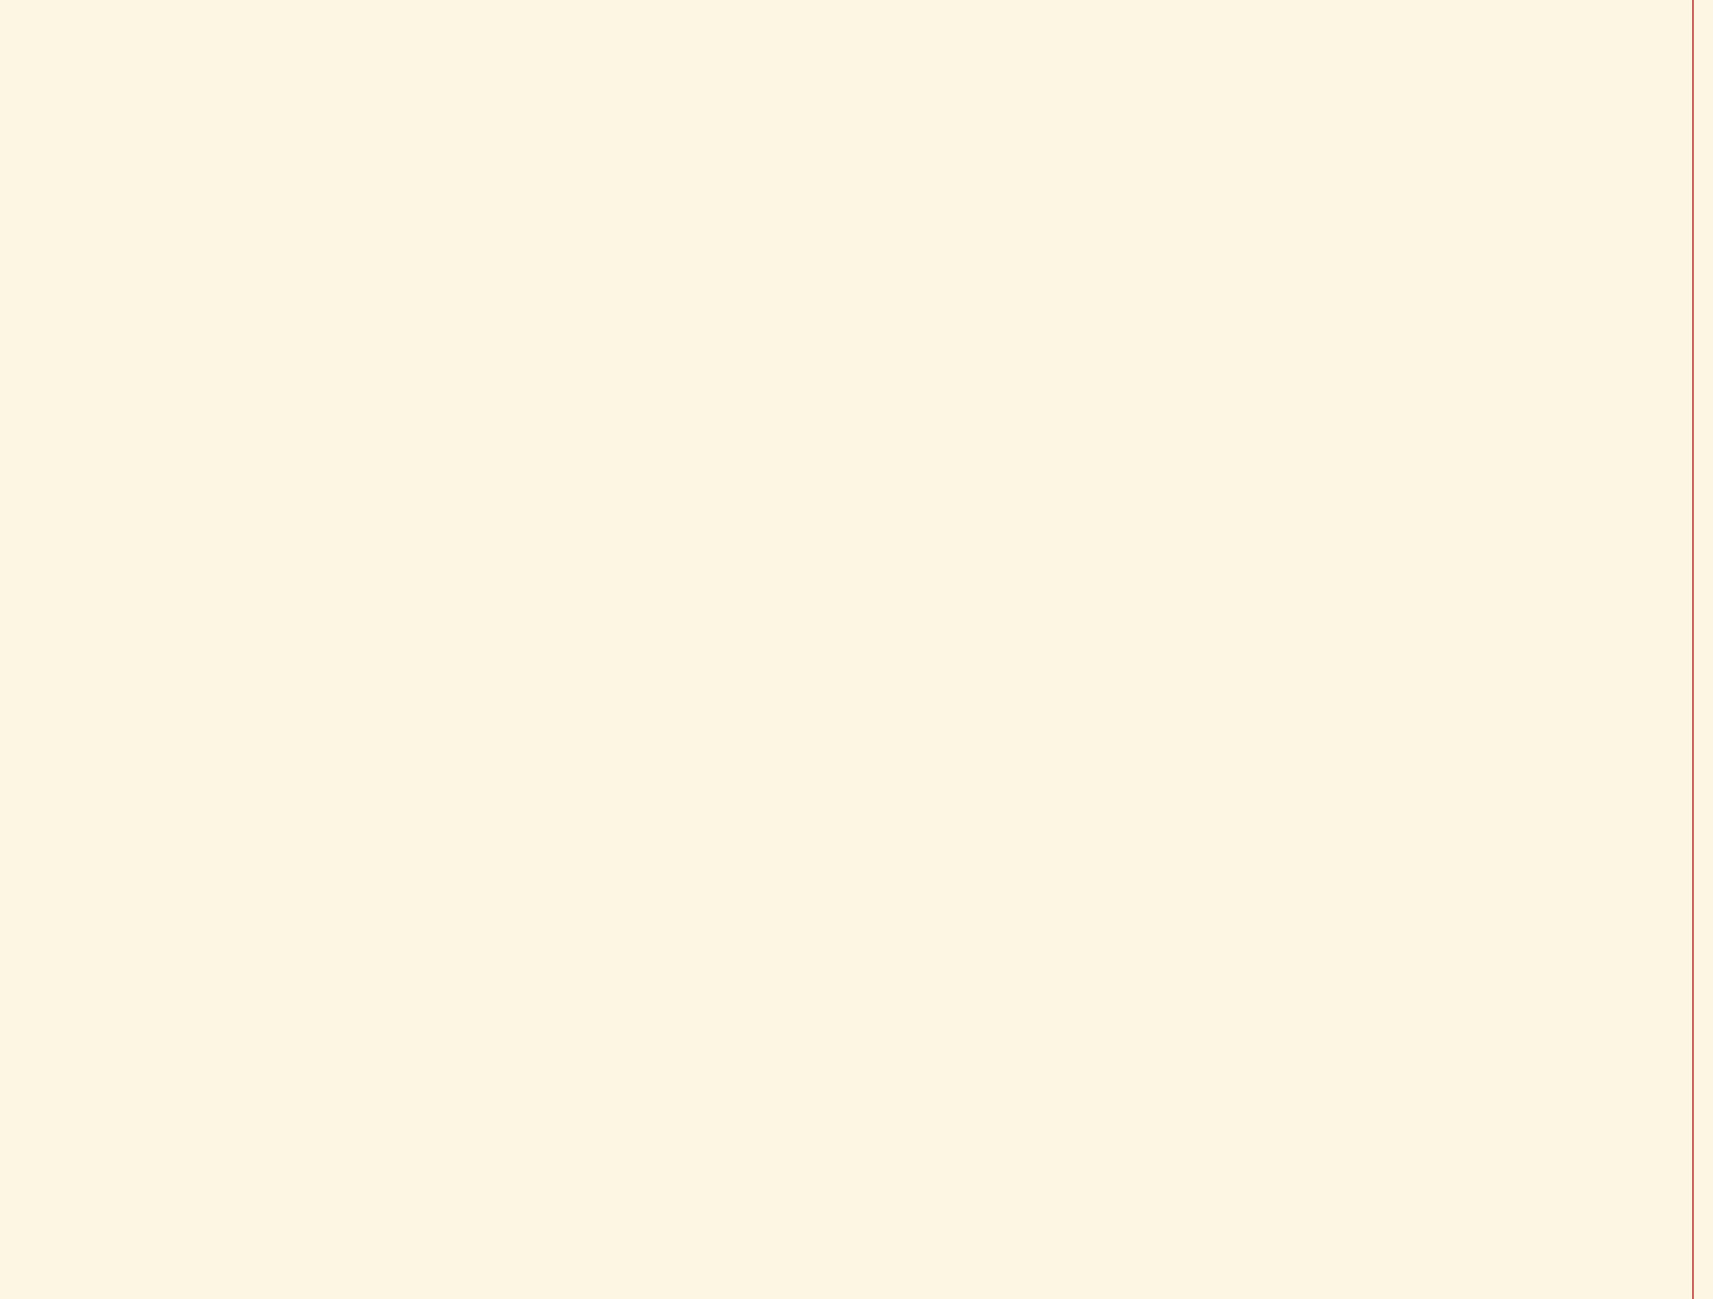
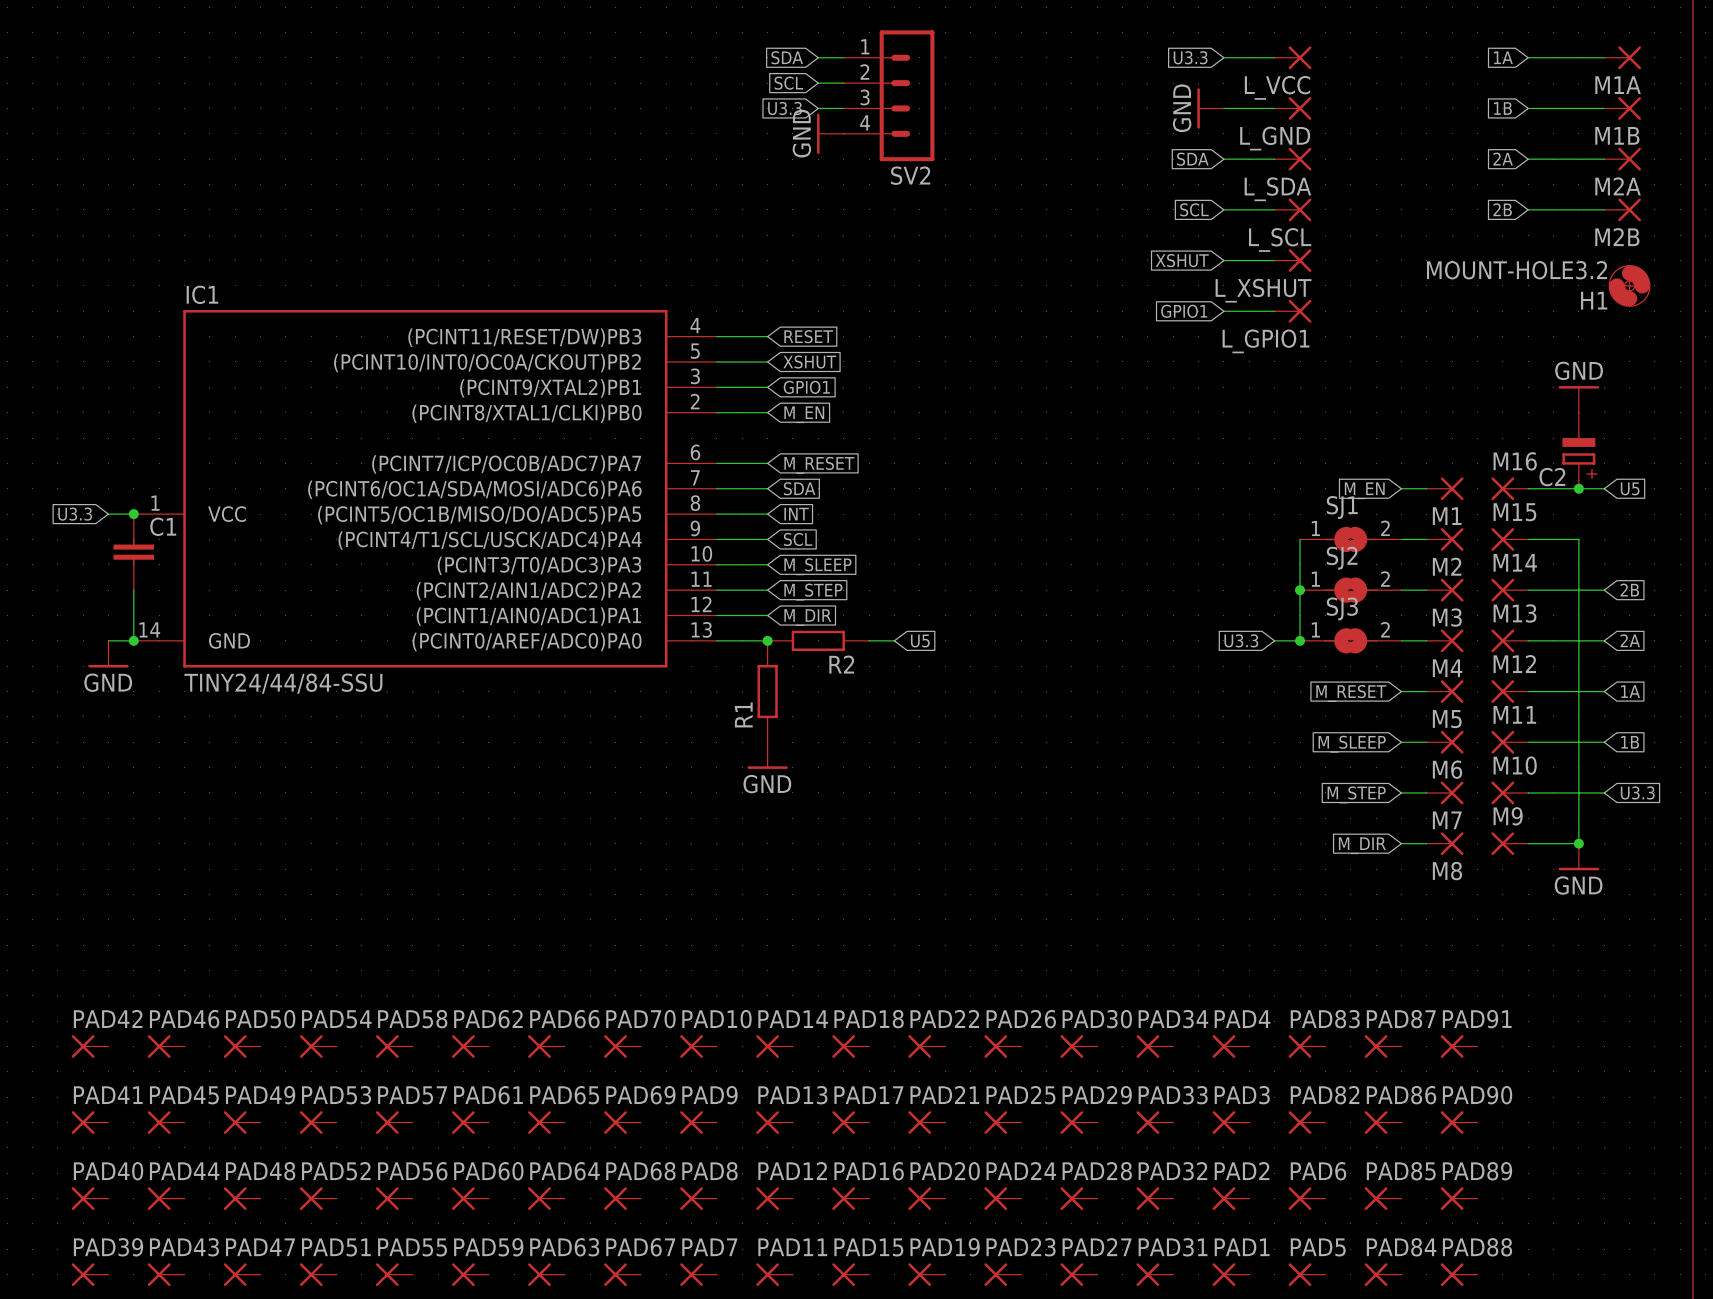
global label: none -> SDA (787, 57)
wire: none -> (818, 57) (843, 57)
global label: none -> U3.3 (1190, 57)
wire: none -> (1223, 57) (1274, 57)
L_VCC: none -> (1293, 57)
global label: none -> 1A (1503, 57)
wire: none -> (1528, 57) (1604, 57)
M1A: none -> (1622, 57)
global label: none -> SCL (788, 83)
wire: none -> (818, 83) (843, 83)
SV2: none -> (889, 95)
global label: none -> U3.3 (785, 108)
wire: none -> (818, 108) (843, 108)
power symbol: none -> GND (1210, 108)
wire: none -> (1223, 108) (1274, 108)
L_GND: none -> (1293, 108)
global label: none -> 1B (1502, 108)
wire: none -> (1528, 108) (1604, 108)
M1B: none -> (1622, 108)
power symbol: none -> GND (830, 133)
global label: none -> SDA (1192, 159)
wire: none -> (1223, 159) (1274, 159)
L_SDA: none -> (1293, 159)
global label: none -> 2A (1503, 159)
wire: none -> (1528, 159) (1604, 159)
M2A: none -> (1622, 159)
global label: none -> SCL (1194, 209)
wire: none -> (1223, 209) (1274, 209)
L_SCL: none -> (1293, 209)
global label: none -> 2B (1502, 209)
wire: none -> (1528, 209) (1604, 209)
M2B: none -> (1622, 209)
global label: none -> XSHUT (1182, 260)
wire: none -> (1223, 260) (1274, 260)
L_XSHUT: none -> (1293, 260)
H1: none -> MOUNT-HOLE3.2 (1629, 285)
global label: none -> GPIO1 (1184, 311)
wire: none -> (1223, 311) (1274, 311)
L_GPIO1: none -> (1293, 311)
wire: none -> (716, 336) (767, 336)
global label: none -> RESET (808, 336)
wire: none -> (716, 361) (767, 361)
global label: none -> XSHUT (809, 362)
wire: none -> (716, 387) (767, 387)
global label: none -> GPIO1 (806, 387)
power symbol: none -> GND (1578, 399)
wire: none -> (716, 412) (767, 412)
global label: none -> M_EN (804, 414)
C2: none -> (1578, 450)
wire: none -> (716, 463) (767, 463)
global label: none -> M_RESET (819, 465)
IC1: none -> TINY24/44/84-SSU (425, 488)
wire: none -> (716, 488) (767, 488)
global label: none -> SDA (799, 488)
wire: none -> (1401, 488) (1426, 488)
M1: none -> (1445, 488)
M16: none -> (1509, 488)
wire: none -> (1528, 488) (1604, 488)
junction: none -> (1578, 488)
global label: none -> U5 (1630, 488)
global label: none -> M_EN (1364, 490)
global label: none -> U3.3 (75, 514)
wire: none -> (108, 514) (133, 514)
junction: none -> (133, 514)
wire: none -> (716, 514) (767, 514)
global label: none -> INT (796, 514)
wire: none -> (716, 539) (767, 539)
global label: none -> SCL (798, 539)
wire: none -> (1300, 539) (1300, 640) (1274, 640)
SJ1: none -> (1350, 539)
wire: none -> (1401, 539) (1426, 539)
M2: none -> (1445, 539)
M15: none -> (1509, 539)
wire: none -> (1528, 539) (1578, 539) (1578, 843) (1528, 843)
C1: none -> (133, 552)
wire: none -> (716, 564) (767, 564)
global label: none -> M_SLEEP (817, 566)
wire: none -> (133, 590) (133, 640) (108, 640)
wire: none -> (716, 590) (767, 590)
global label: none -> M_STEP (813, 592)
junction: none -> (1300, 590)
SJ2: none -> (1350, 590)
wire: none -> (1401, 590) (1426, 590)
M3: none -> (1445, 590)
M14: none -> (1509, 590)
wire: none -> (1528, 590) (1604, 590)
global label: none -> 2B (1629, 590)
wire: none -> (716, 615) (767, 615)
global label: none -> M_DIR (807, 617)
junction: none -> (133, 640)
wire: none -> (716, 640) (767, 640)
junction: none -> (767, 640)
R2: none -> (818, 640)
wire: none -> (869, 640) (894, 640)
global label: none -> U5 (920, 640)
global label: none -> U3.3 (1241, 640)
junction: none -> (1300, 640)
SJ3: none -> (1350, 640)
wire: none -> (1401, 640) (1426, 640)
M4: none -> (1445, 640)
M13: none -> (1509, 640)
wire: none -> (1528, 640) (1604, 640)
global label: none -> 2A (1630, 640)
power symbol: none -> GND (108, 654)
R1: none -> (767, 691)
wire: none -> (1401, 691) (1426, 691)
M5: none -> (1445, 691)
M12: none -> (1509, 691)
wire: none -> (1528, 691) (1604, 691)
global label: none -> 1A (1630, 691)
global label: none -> M_RESET (1351, 693)
global label: none -> M_SLEEP (1352, 744)
wire: none -> (1401, 742) (1426, 742)
M6: none -> (1445, 742)
M11: none -> (1509, 742)
wire: none -> (1528, 742) (1604, 742)
global label: none -> 1B (1630, 742)
power symbol: none -> GND (767, 755)
wire: none -> (1401, 792) (1426, 792)
M7: none -> (1445, 792)
M10: none -> (1509, 792)
wire: none -> (1528, 792) (1604, 792)
global label: none -> U3.3 (1637, 792)
global label: none -> M_STEP (1356, 794)
wire: none -> (1401, 843) (1426, 843)
M8: none -> (1445, 843)
M9: none -> (1509, 843)
junction: none -> (1578, 843)
global label: none -> M_DIR (1362, 845)
power symbol: none -> GND (1578, 856)
PAD42: none -> (90, 1046)
PAD46: none -> (166, 1046)
PAD50: none -> (242, 1046)
PAD54: none -> (318, 1046)
PAD58: none -> (394, 1046)
PAD62: none -> (470, 1046)
PAD66: none -> (546, 1046)
PAD70: none -> (622, 1046)
PAD10: none -> (698, 1046)
PAD14: none -> (774, 1046)
PAD18: none -> (850, 1046)
PAD22: none -> (926, 1046)
PAD26: none -> (1002, 1046)
PAD30: none -> (1078, 1046)
PAD34: none -> (1154, 1046)
PAD4: none -> (1230, 1046)
PAD83: none -> (1306, 1046)
PAD87: none -> (1383, 1046)
PAD91: none -> (1459, 1046)
PAD41: none -> (90, 1122)
PAD45: none -> (166, 1122)
PAD49: none -> (242, 1122)
PAD53: none -> (318, 1122)
PAD57: none -> (394, 1122)
PAD61: none -> (470, 1122)
PAD65: none -> (546, 1122)
PAD69: none -> (622, 1122)
PAD9: none -> (698, 1122)
PAD13: none -> (774, 1122)
PAD17: none -> (850, 1122)
PAD21: none -> (926, 1122)
PAD25: none -> (1002, 1122)
PAD29: none -> (1078, 1122)
PAD33: none -> (1154, 1122)
PAD3: none -> (1230, 1122)
PAD82: none -> (1306, 1122)
PAD86: none -> (1383, 1122)
PAD90: none -> (1459, 1122)
PAD40: none -> (90, 1198)
PAD44: none -> (166, 1198)
PAD48: none -> (242, 1198)
PAD52: none -> (318, 1198)
PAD56: none -> (394, 1198)
PAD60: none -> (470, 1198)
PAD64: none -> (546, 1198)
PAD68: none -> (622, 1198)
PAD8: none -> (698, 1198)
PAD12: none -> (774, 1198)
PAD16: none -> (850, 1198)
PAD20: none -> (926, 1198)
PAD24: none -> (1002, 1198)
PAD28: none -> (1078, 1198)
PAD32: none -> (1154, 1198)
PAD2: none -> (1230, 1198)
PAD6: none -> (1306, 1198)
PAD85: none -> (1383, 1198)
PAD89: none -> (1459, 1198)
PAD39: none -> (90, 1274)
PAD43: none -> (166, 1274)
PAD47: none -> (242, 1274)
PAD51: none -> (318, 1274)
PAD55: none -> (394, 1274)
PAD59: none -> (470, 1274)
PAD63: none -> (546, 1274)
PAD67: none -> (622, 1274)
PAD7: none -> (698, 1274)
PAD11: none -> (774, 1274)
PAD15: none -> (850, 1274)
PAD19: none -> (926, 1274)
PAD23: none -> (1002, 1274)
PAD27: none -> (1078, 1274)
PAD31: none -> (1154, 1274)
PAD1: none -> (1230, 1274)
PAD5: none -> (1306, 1274)
PAD84: none -> (1383, 1274)
PAD88: none -> (1459, 1274)

